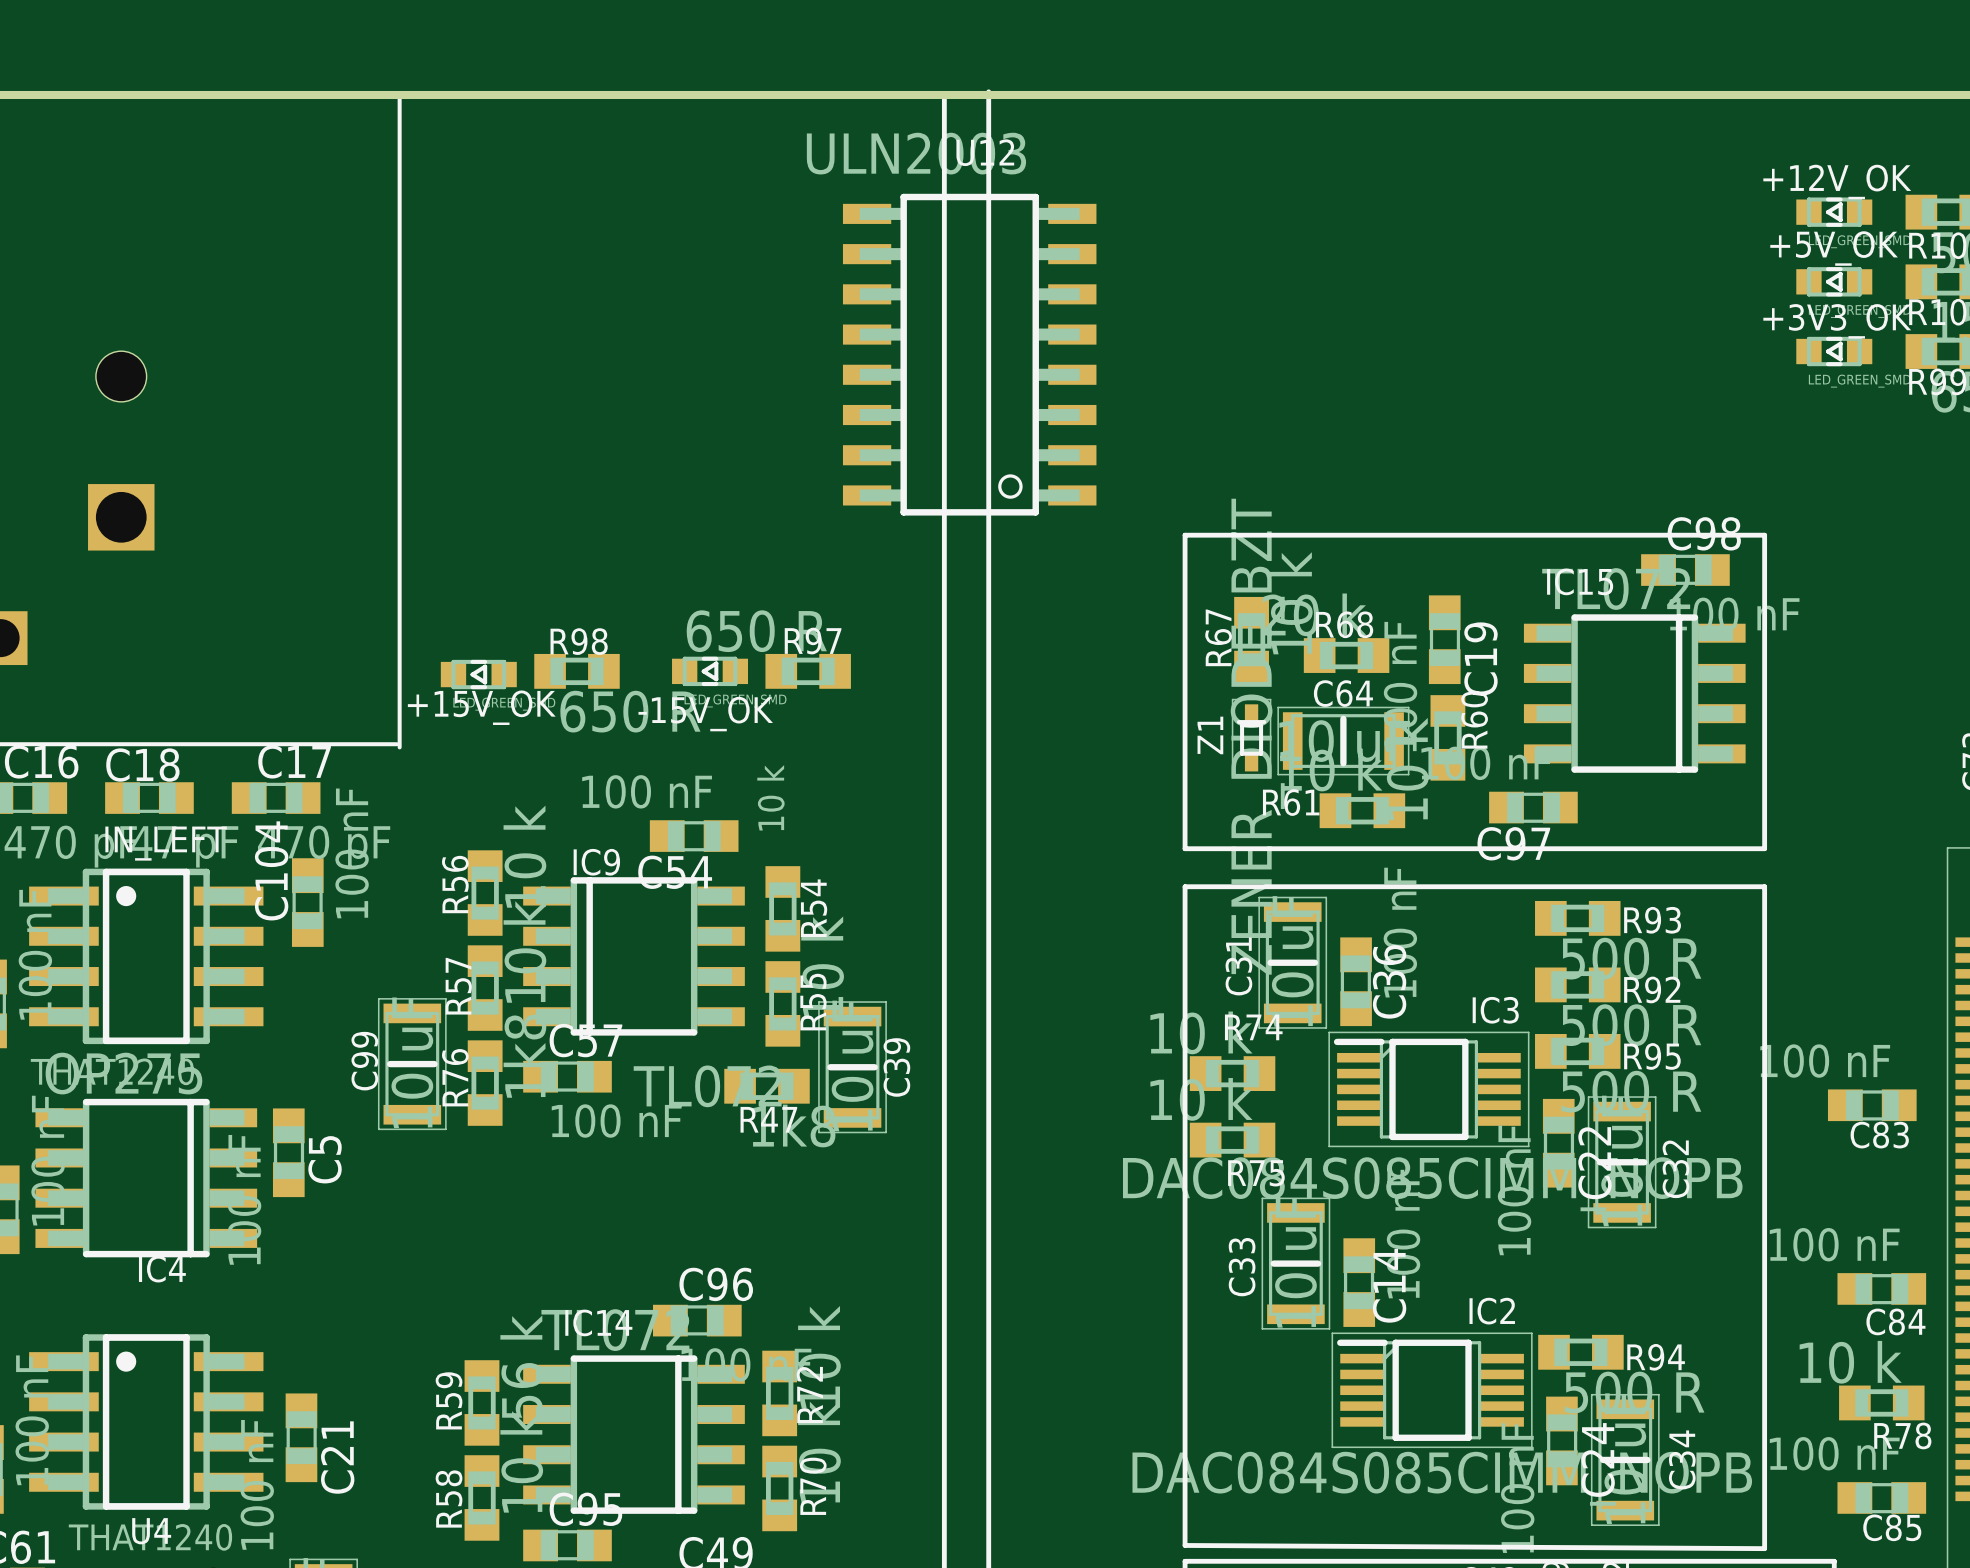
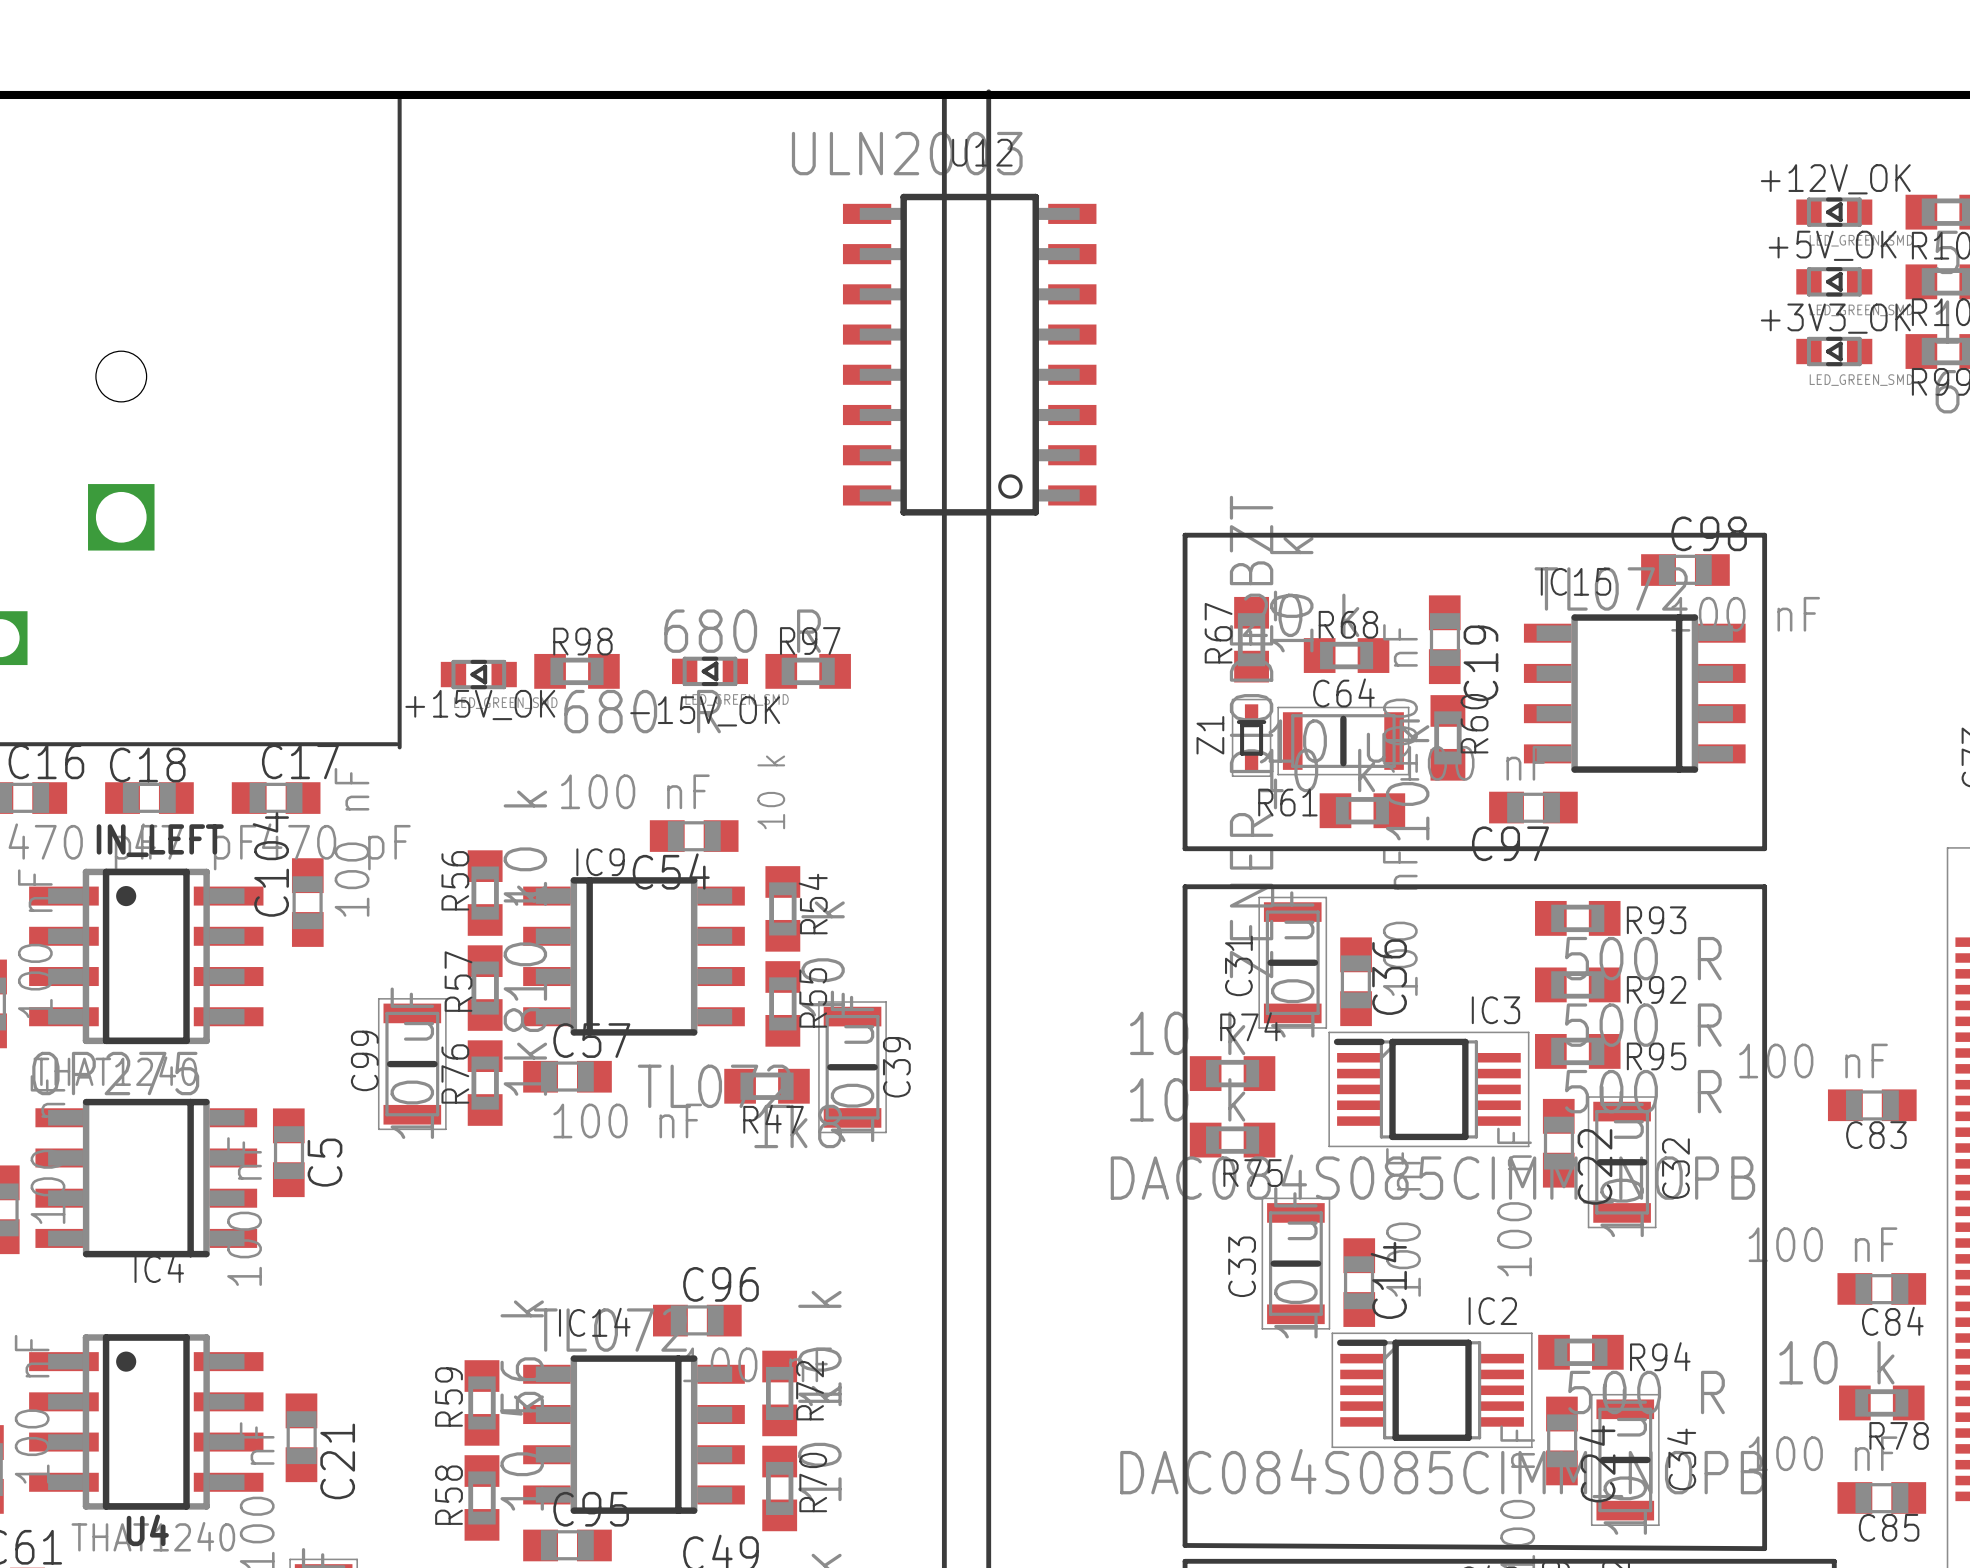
R97 value: 650 R (756, 631) -> 680 R (742, 631)
R98 value: 650 R (630, 711) -> 680 R (642, 711)

